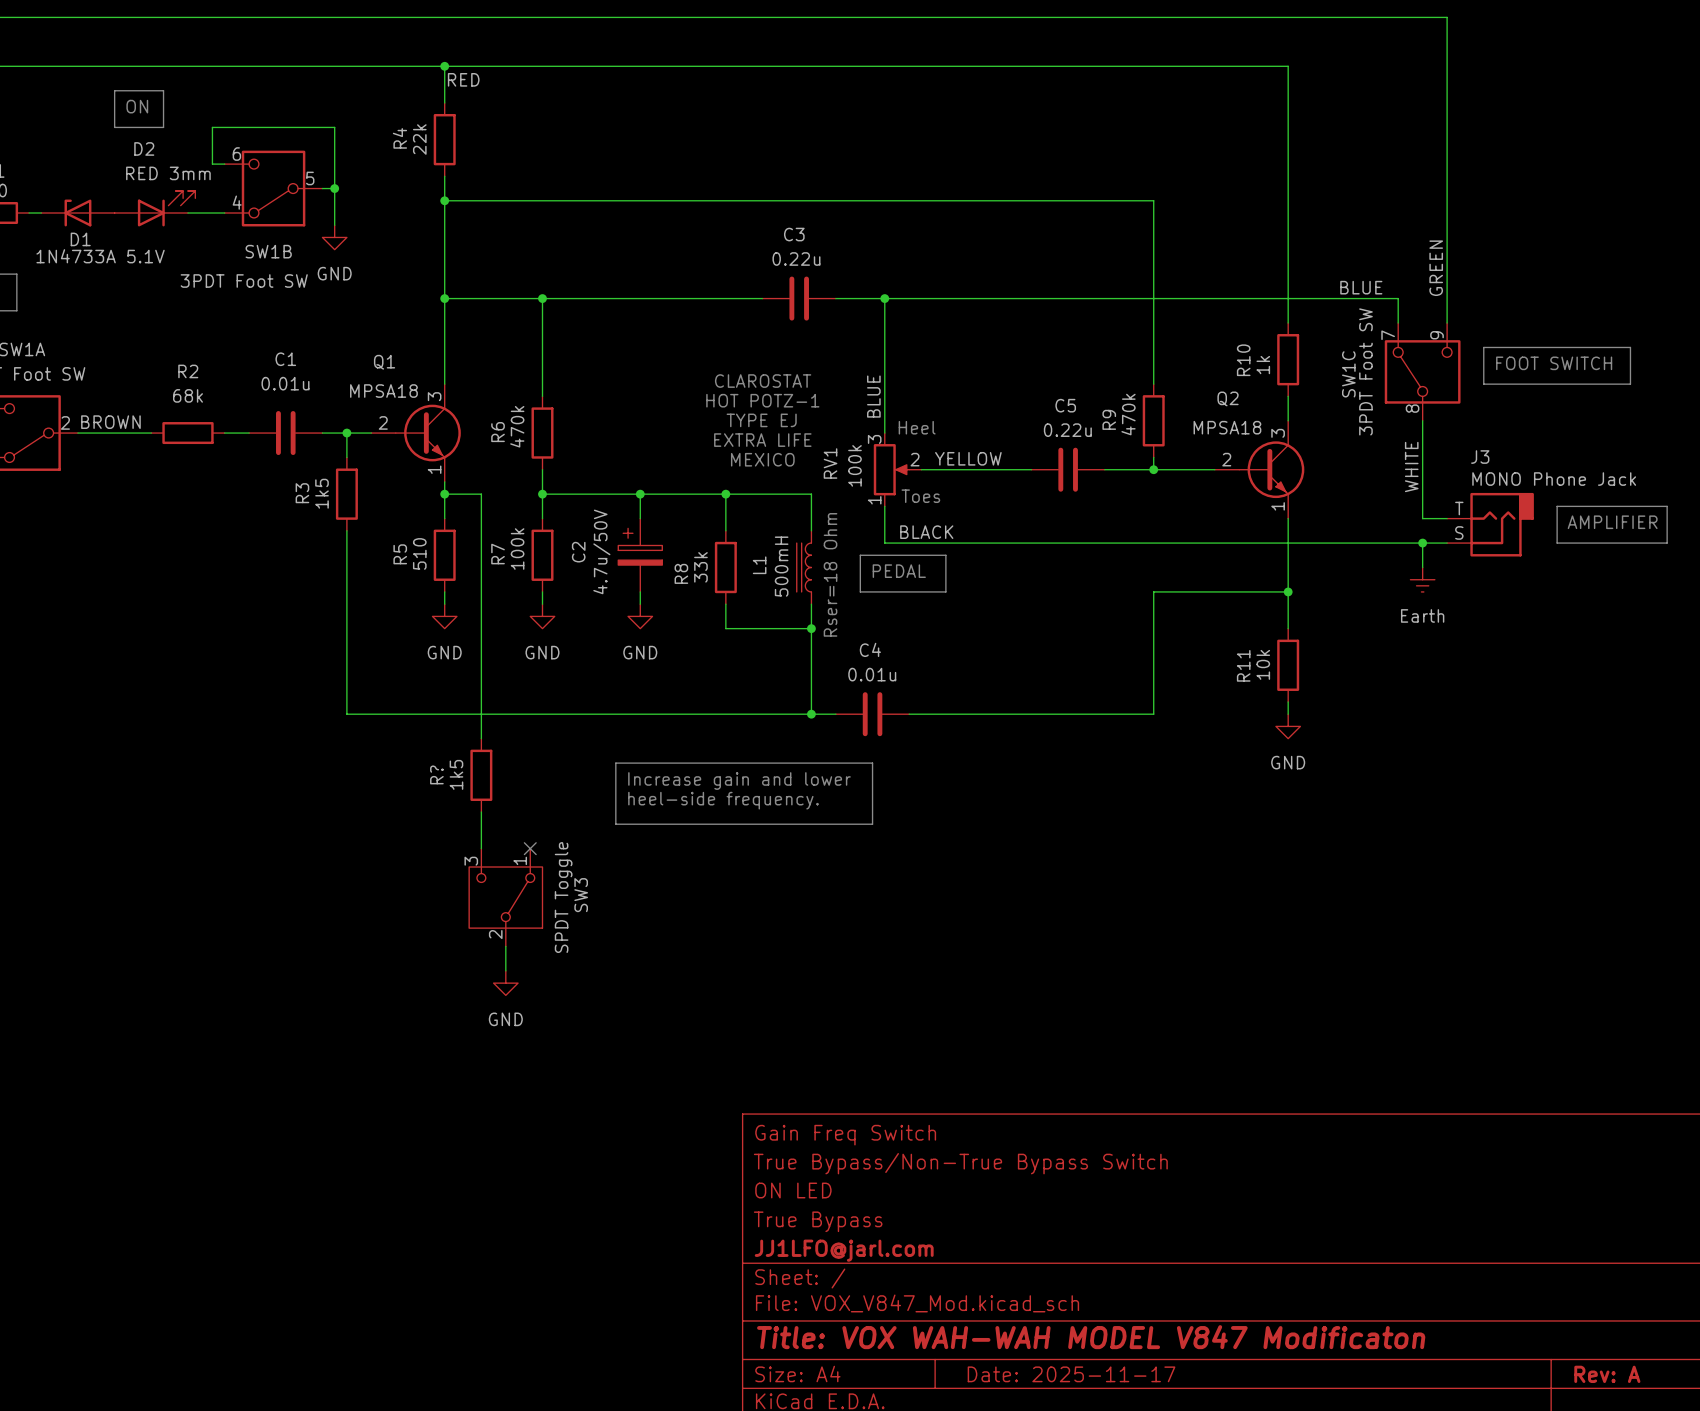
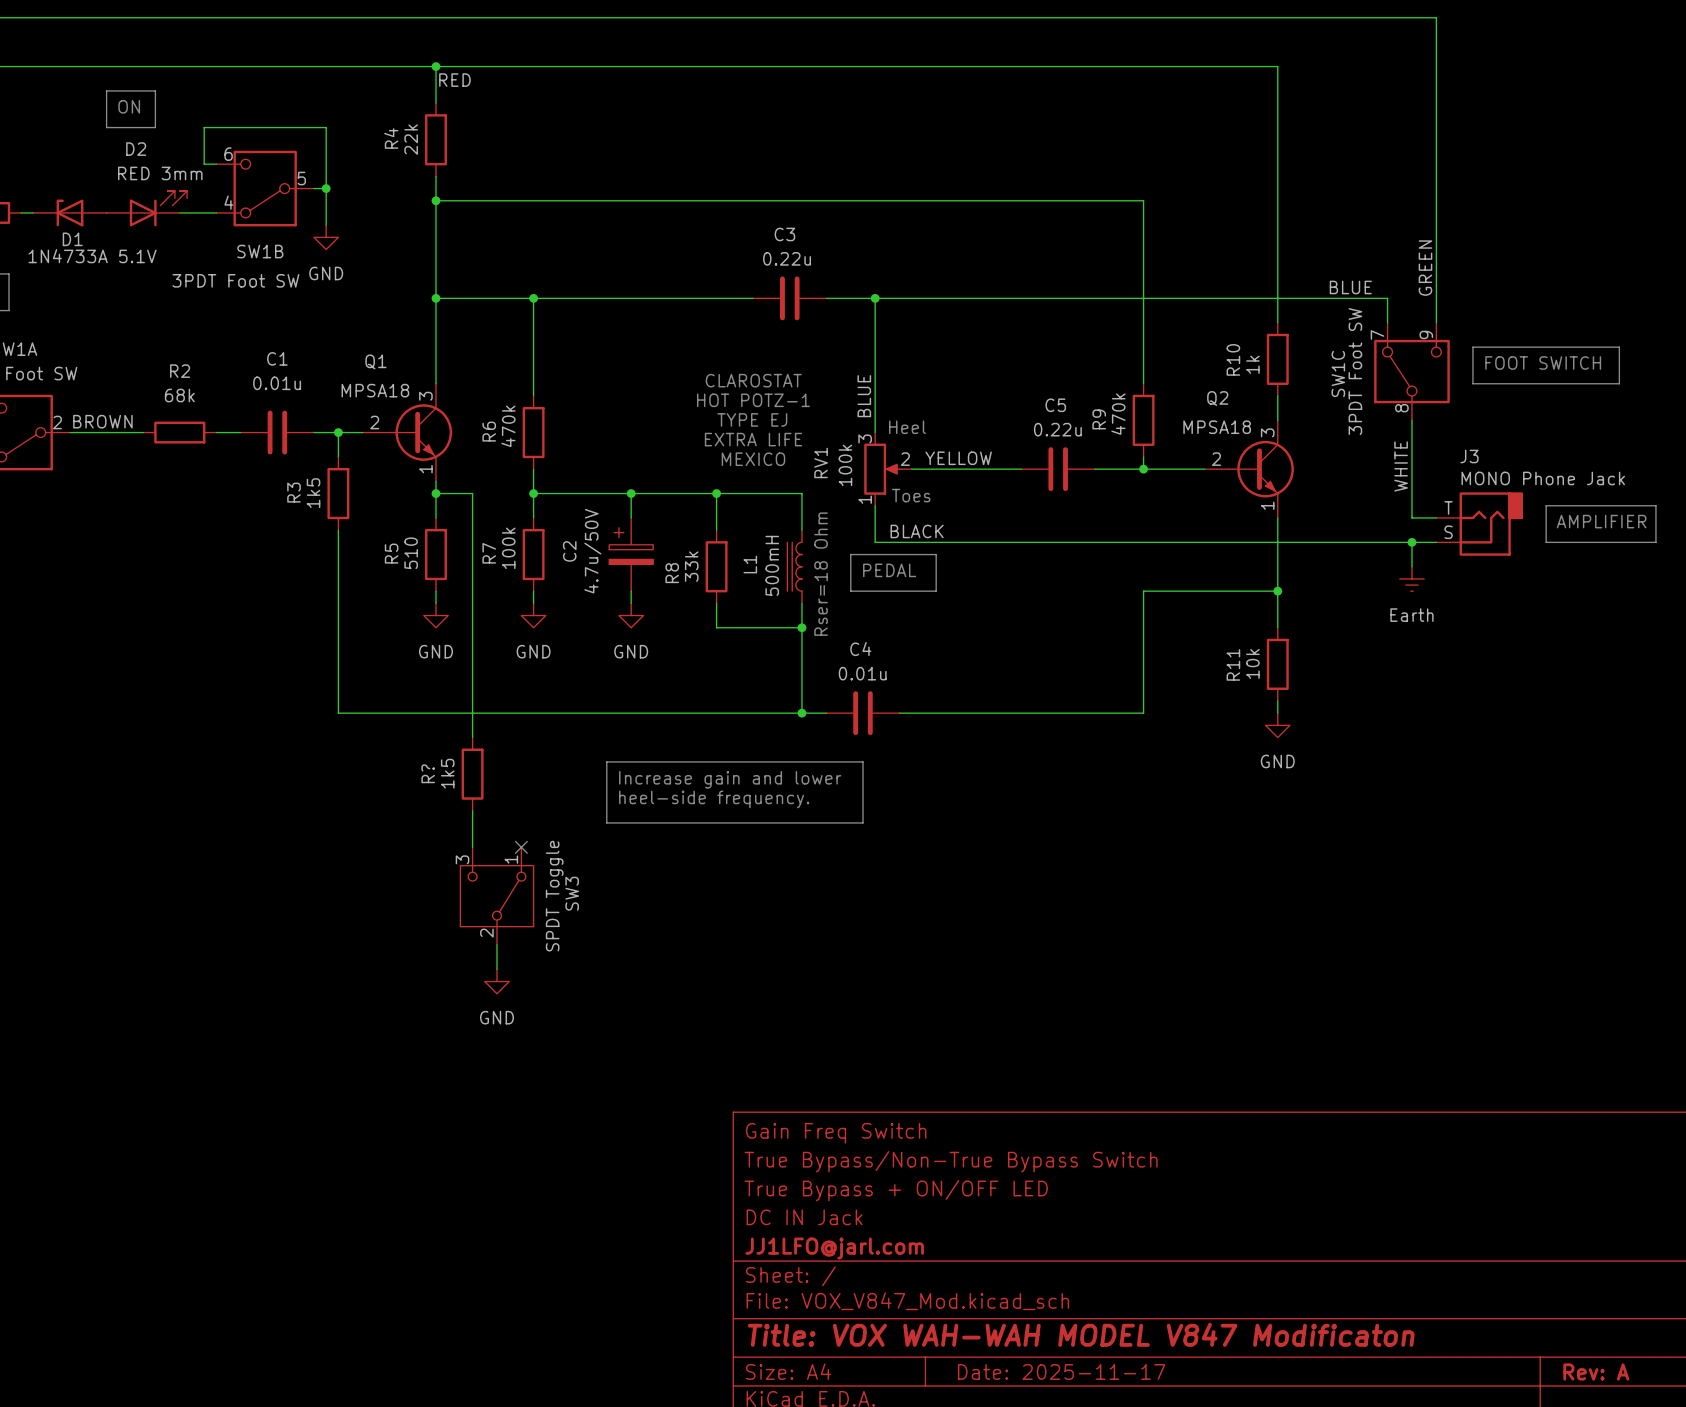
title block: ON LED (793, 1190) -> True Bypass + ON/OFF LED (896, 1190)
title block: True Bypass (818, 1221) -> DC IN Jack (804, 1217)

